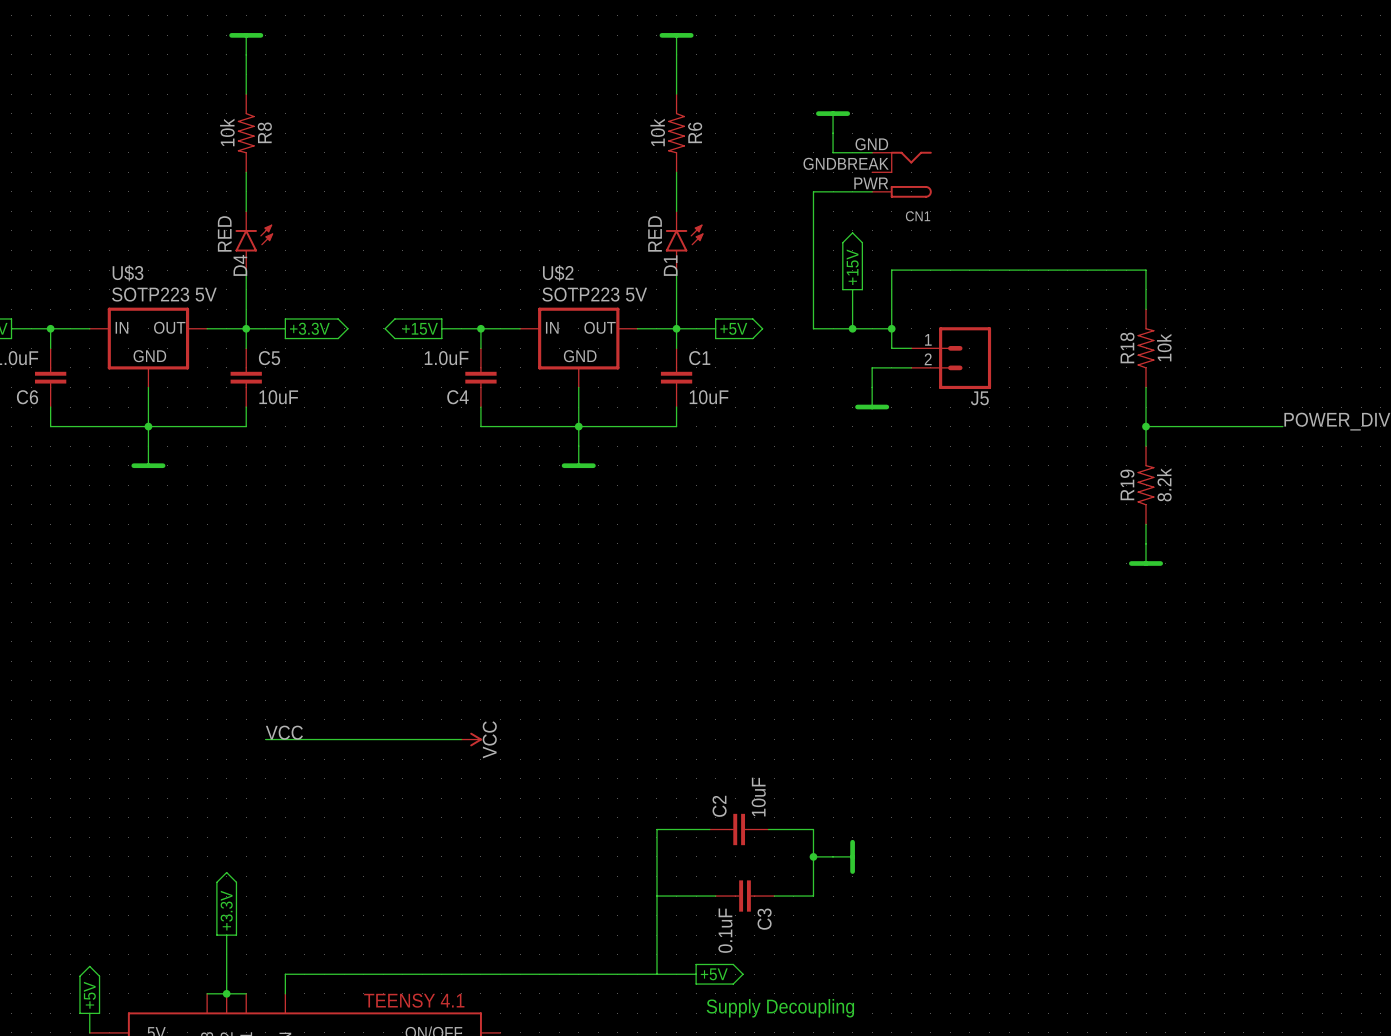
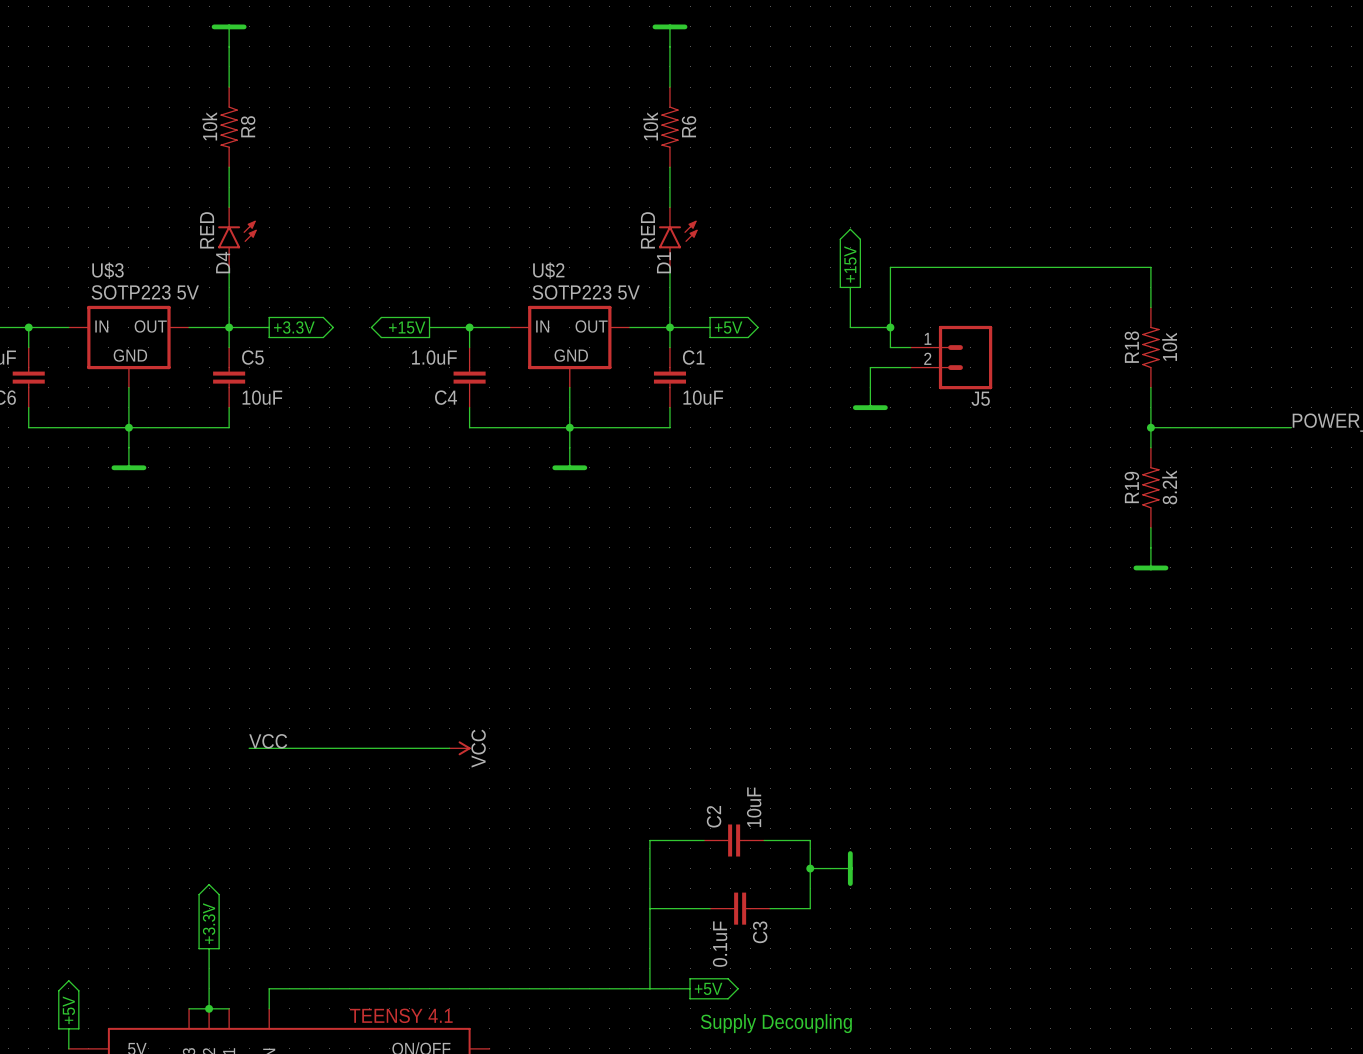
power symbol: (833, 122) -> none
wire: (833, 133) (833, 152) (872, 152) -> none
CN1: (901, 174) -> none
wire: (872, 191) (813, 191) (813, 328) (852, 328) -> none
junction: (852, 328) -> none

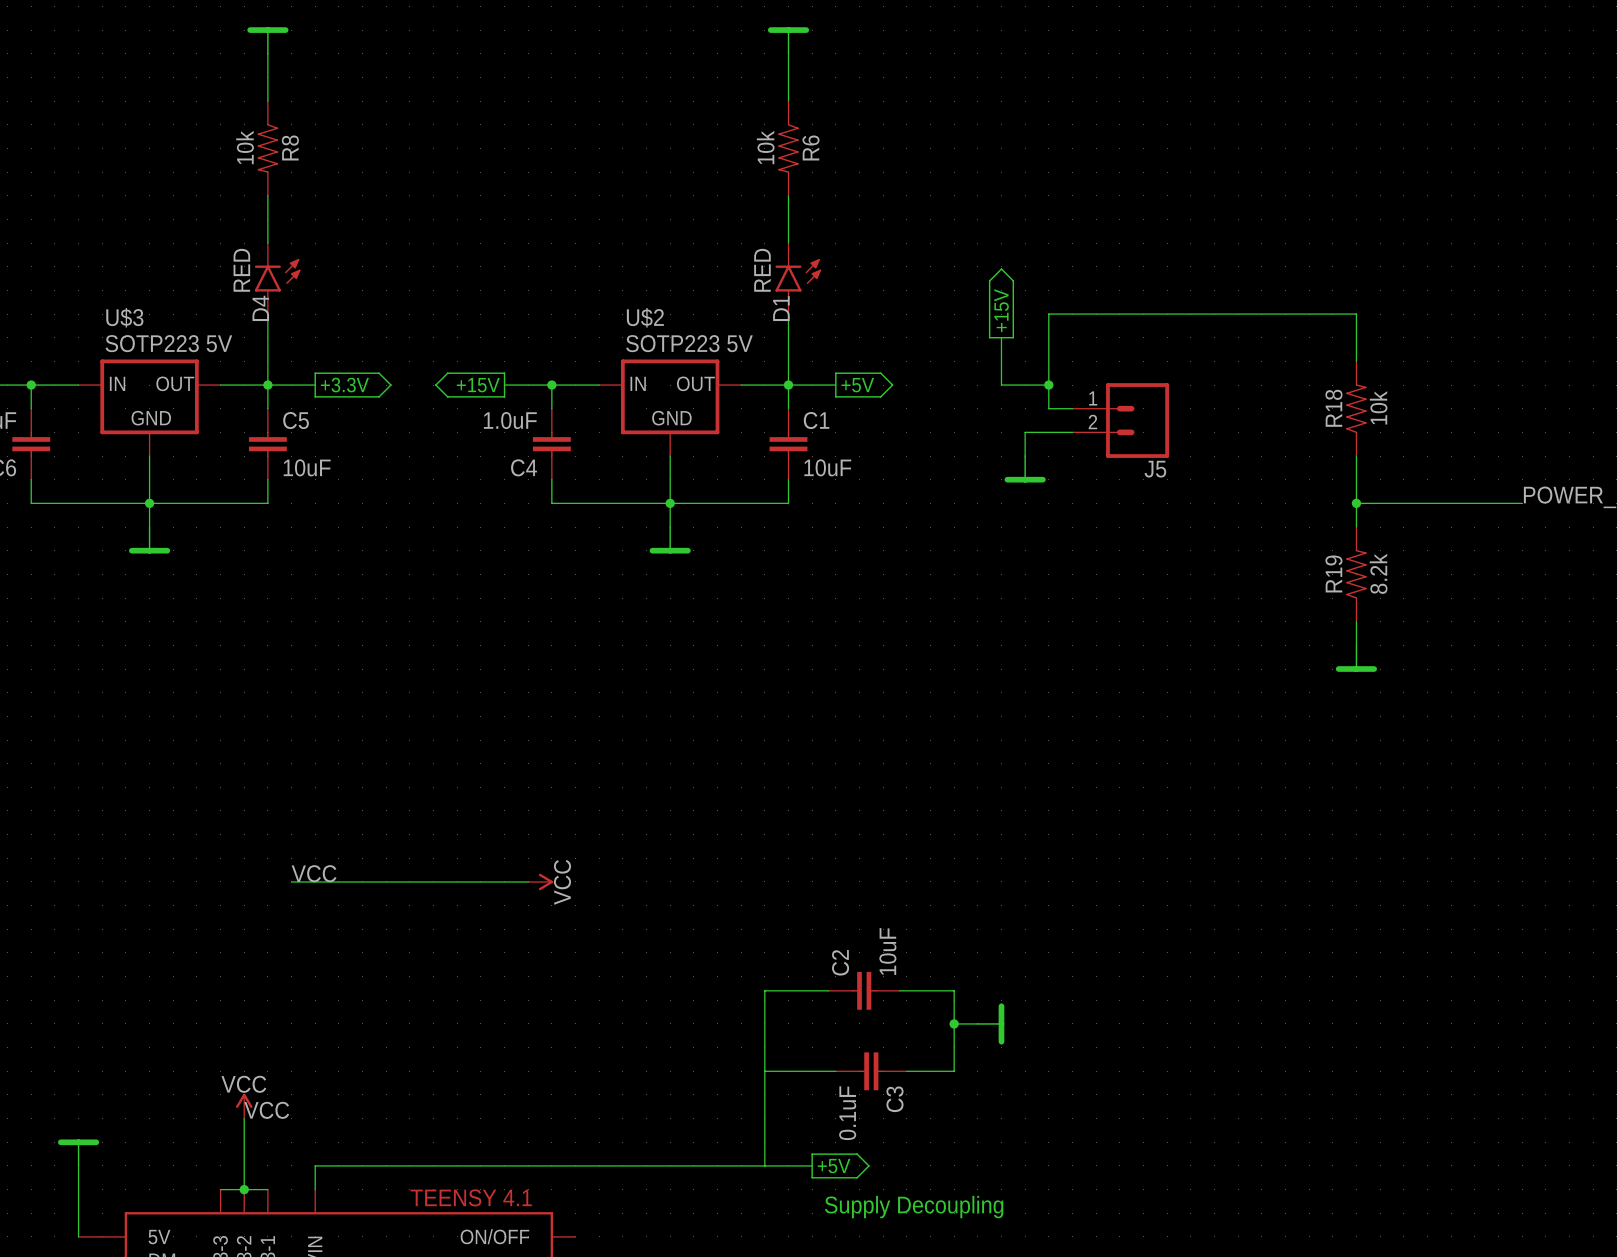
power symbol: (209, 916) -> none
power symbol: none -> VCC (244, 1106)
label: none -> VCC (266, 1110)
power symbol: none -> (78, 1153)
wire: none -> (78, 1165) (78, 1213)
power symbol: (68, 1004) -> none

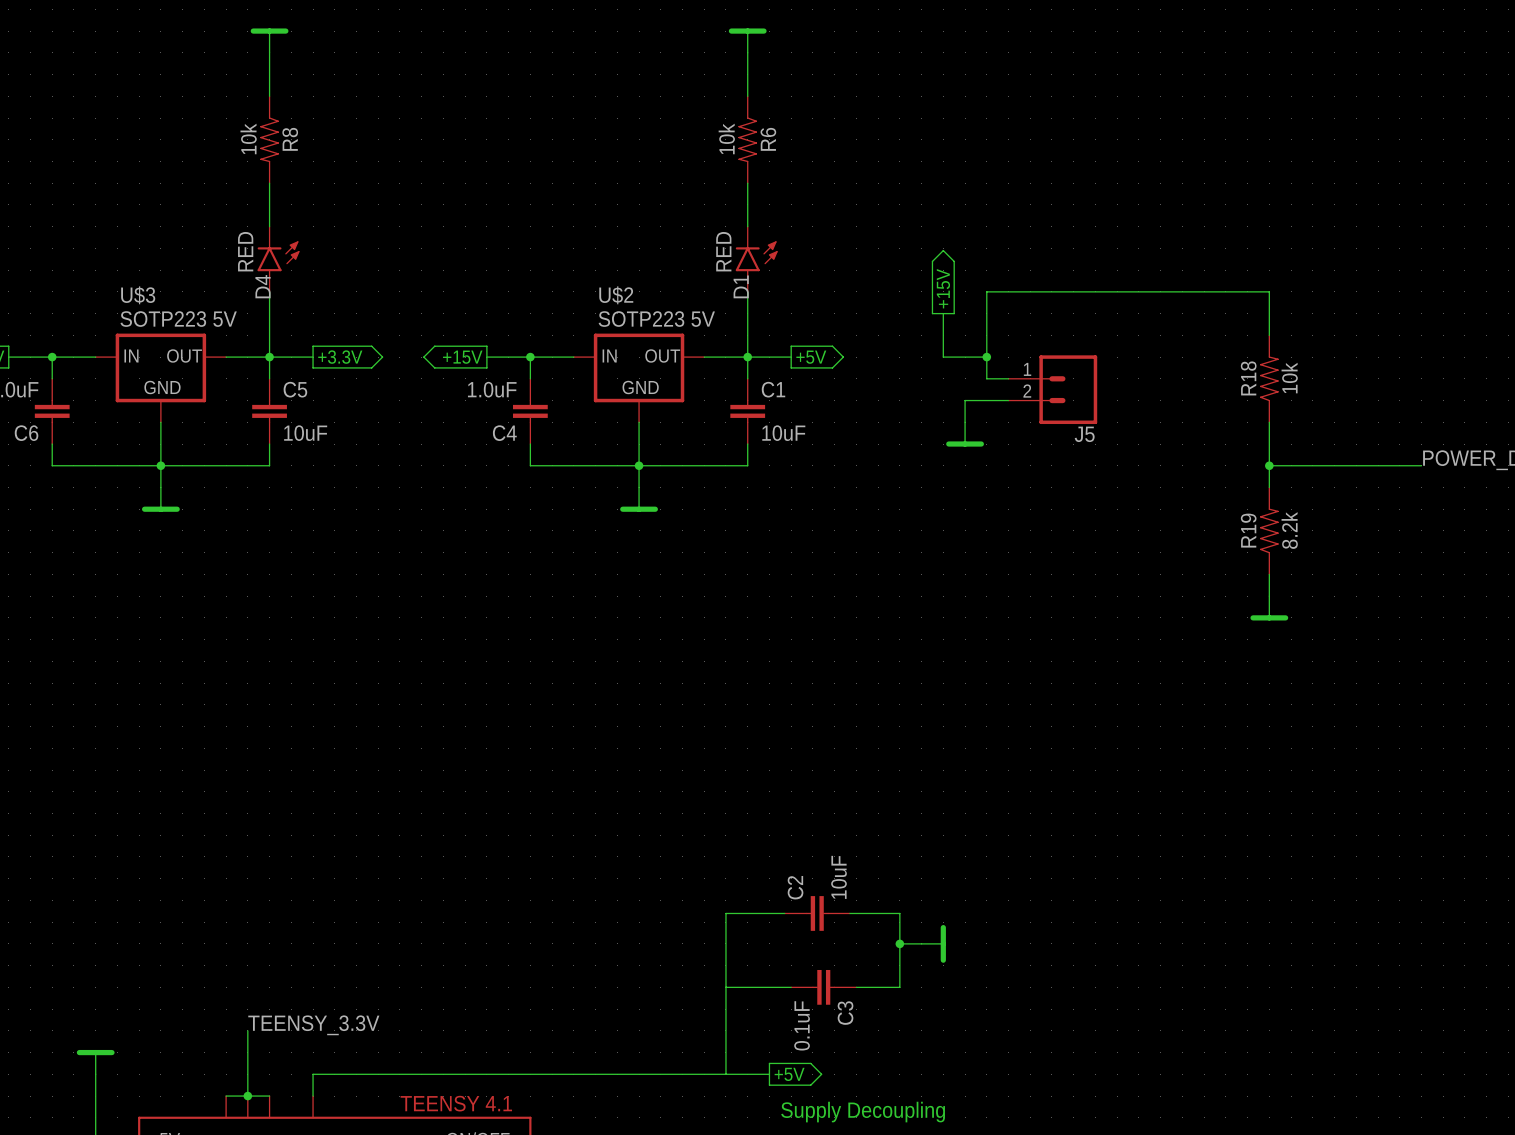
label: VCC (314, 873) -> none
wire: (291, 881) (528, 881) -> none
power symbol: VCC (540, 881) -> none
power symbol: VCC (244, 1106) -> none
label: VCC (266, 1110) -> TEENSY_3.3V (313, 1025)

